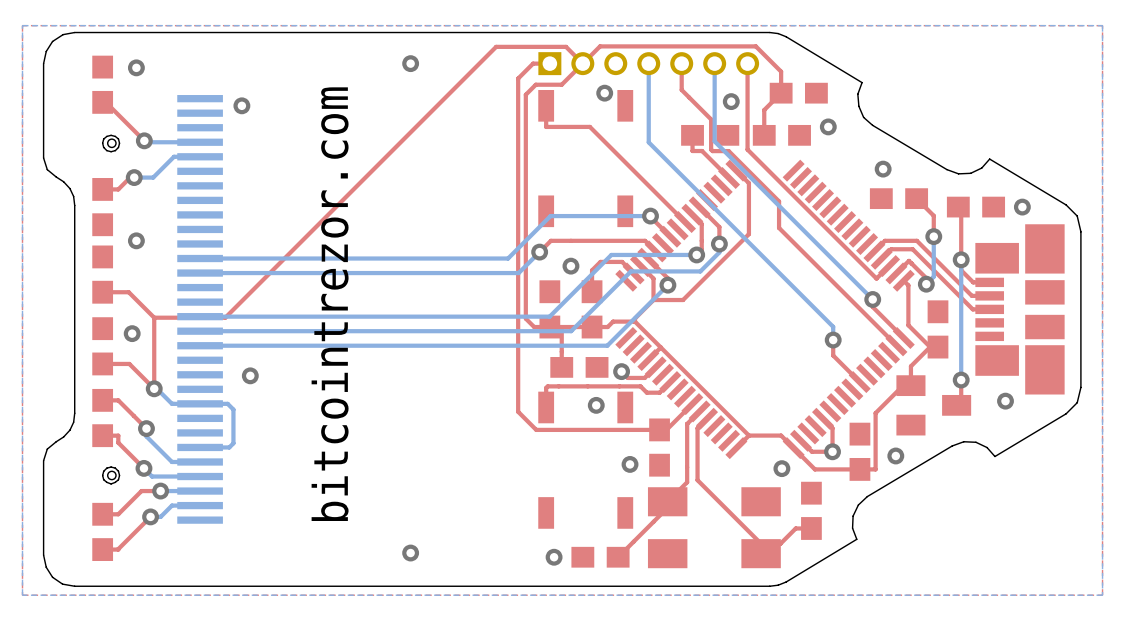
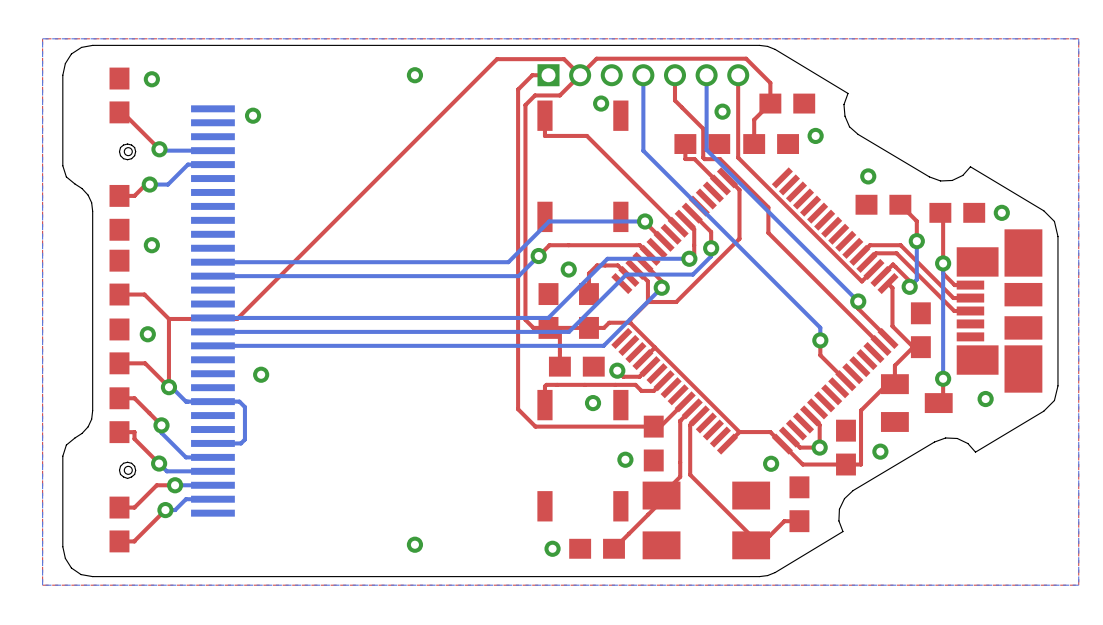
text: bitcointrezor.com (330, 304) -> none

